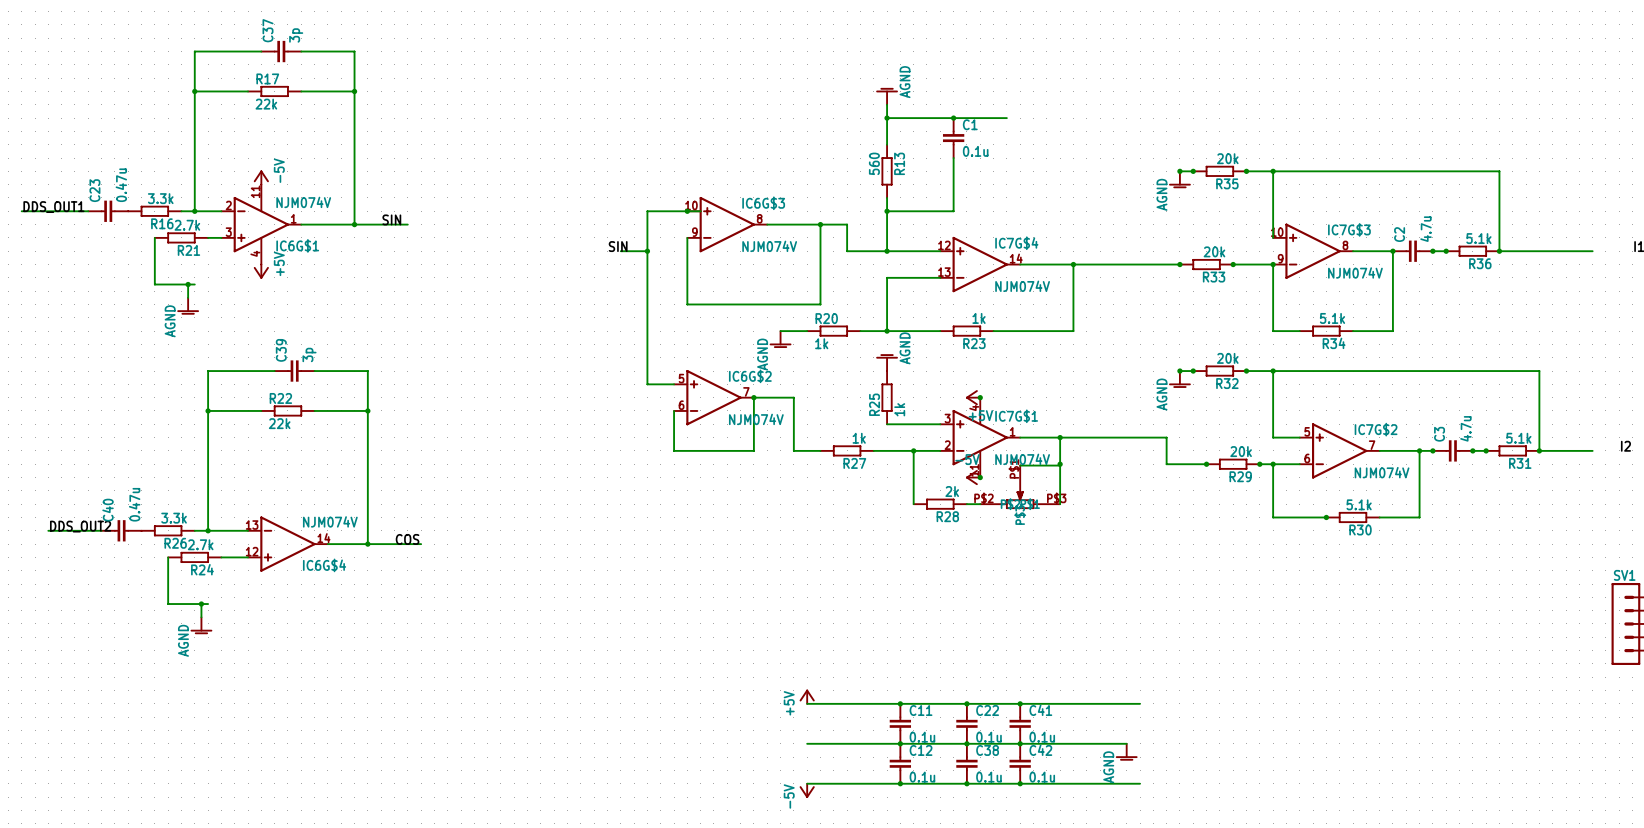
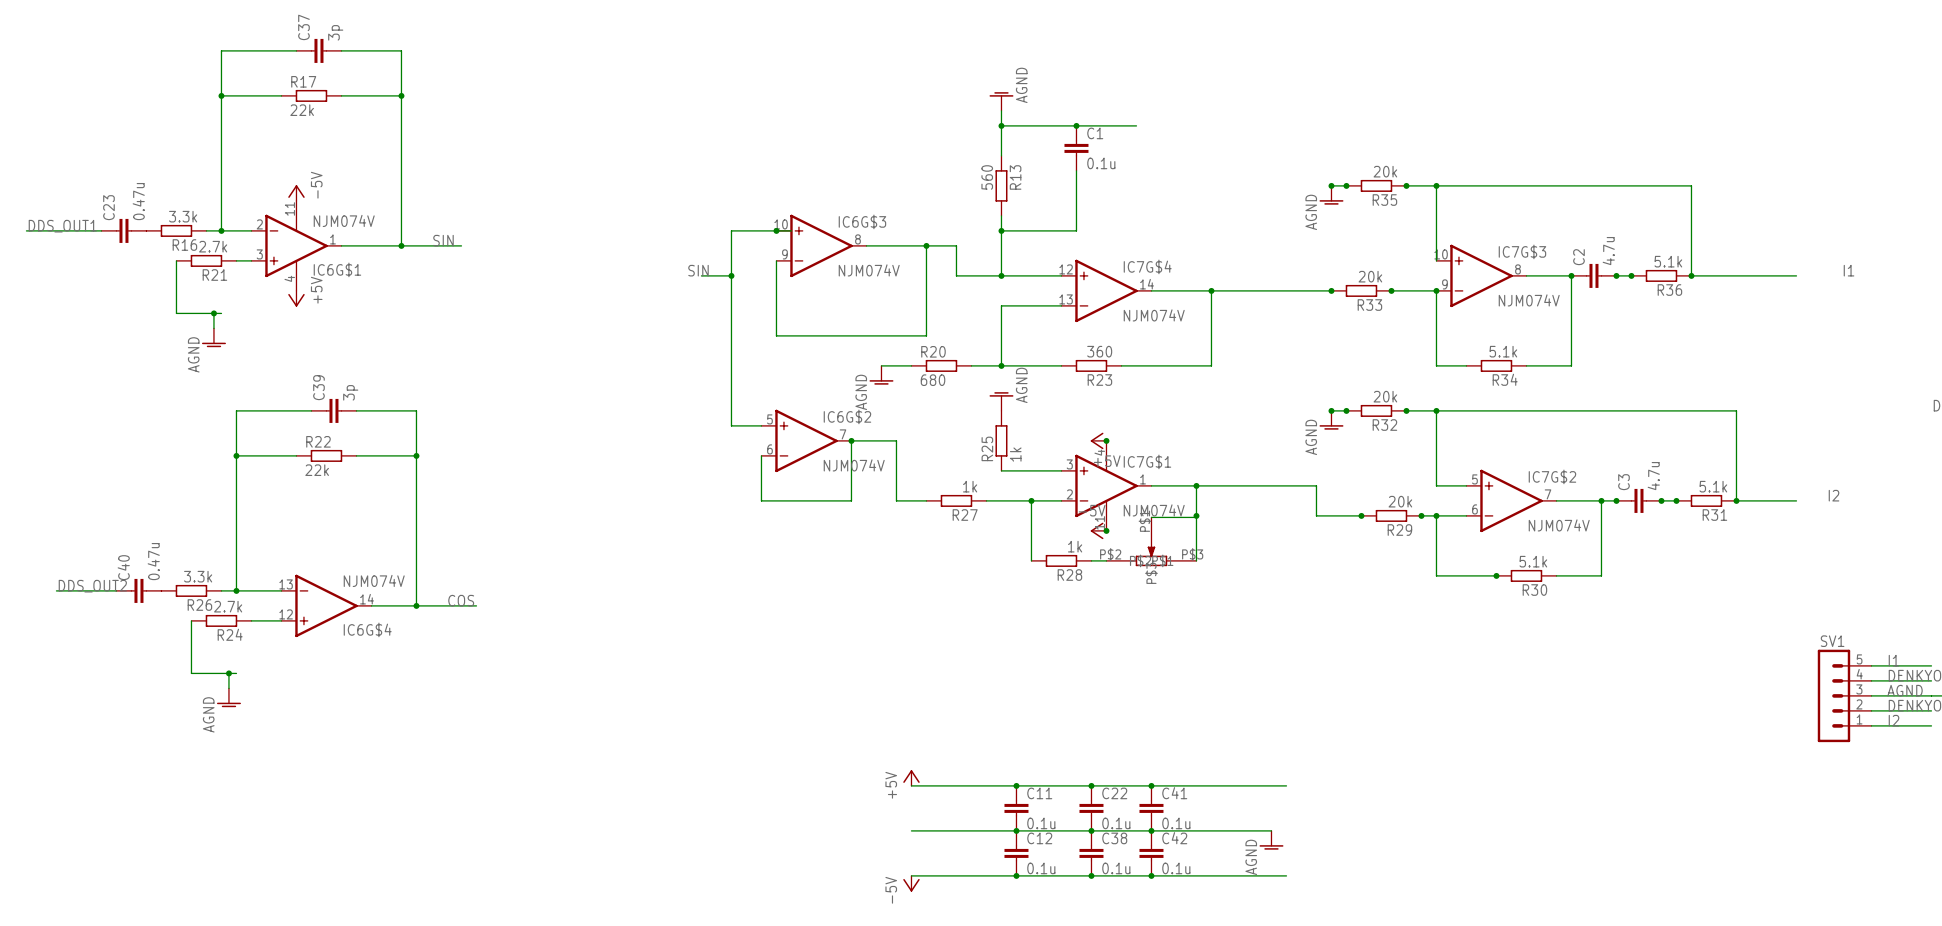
R23 value: 1k (979, 318) -> 360 (1099, 351)
R20 value: 1k (821, 343) -> 680 (933, 380)
R28 value: 2k (952, 491) -> 1k (1075, 546)

